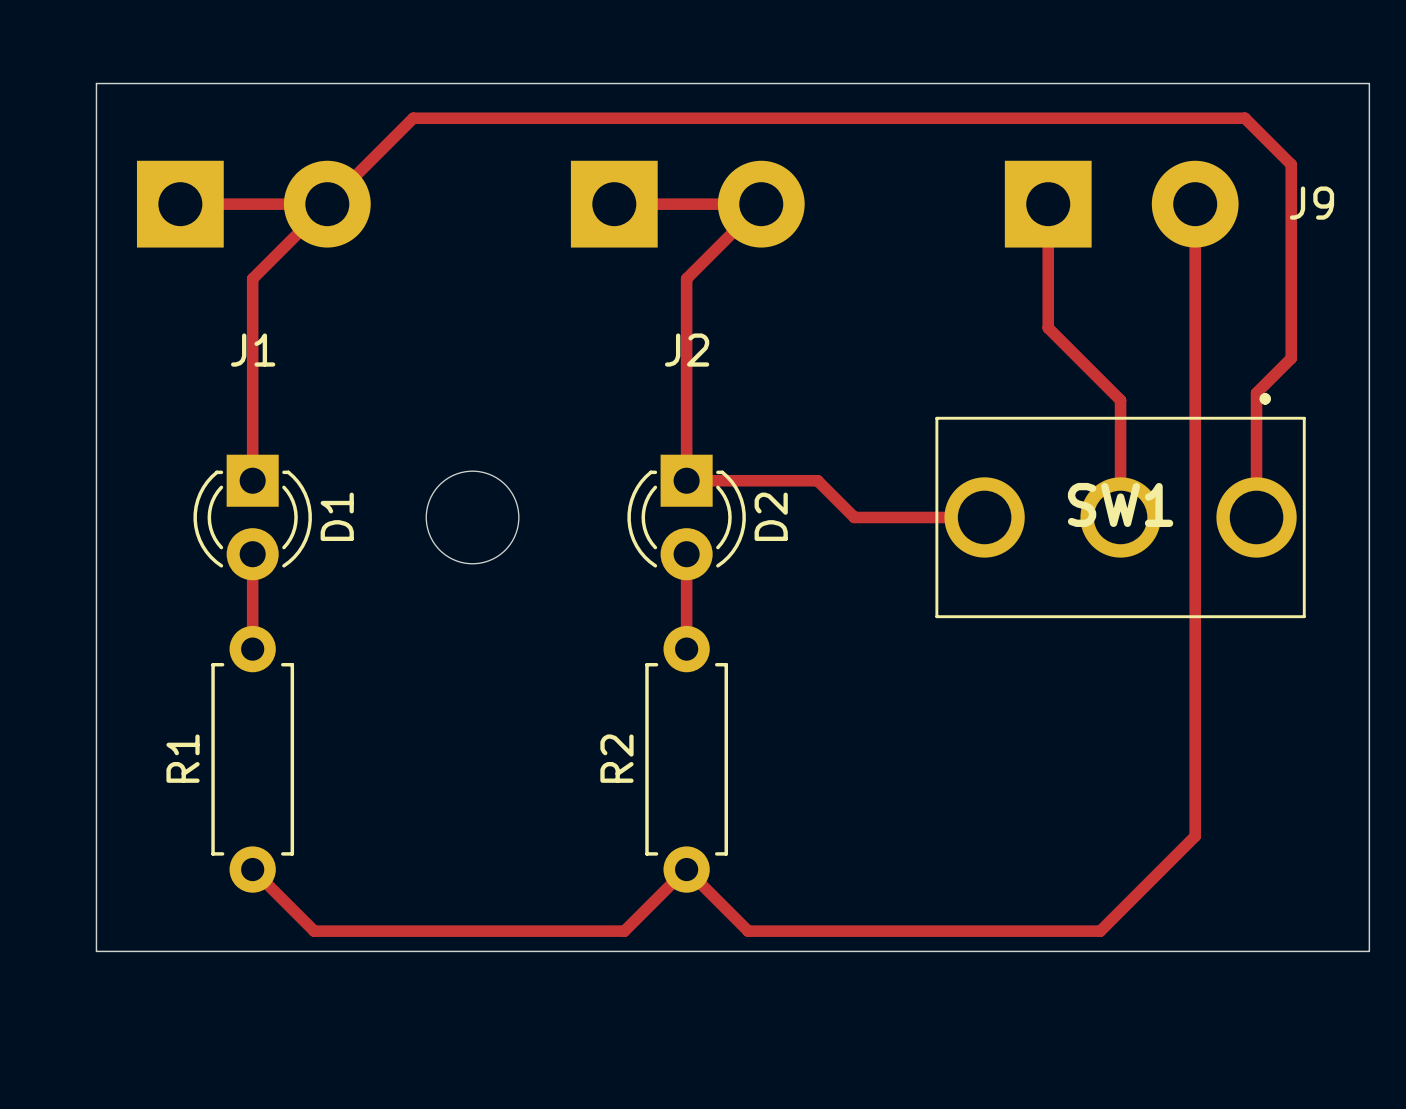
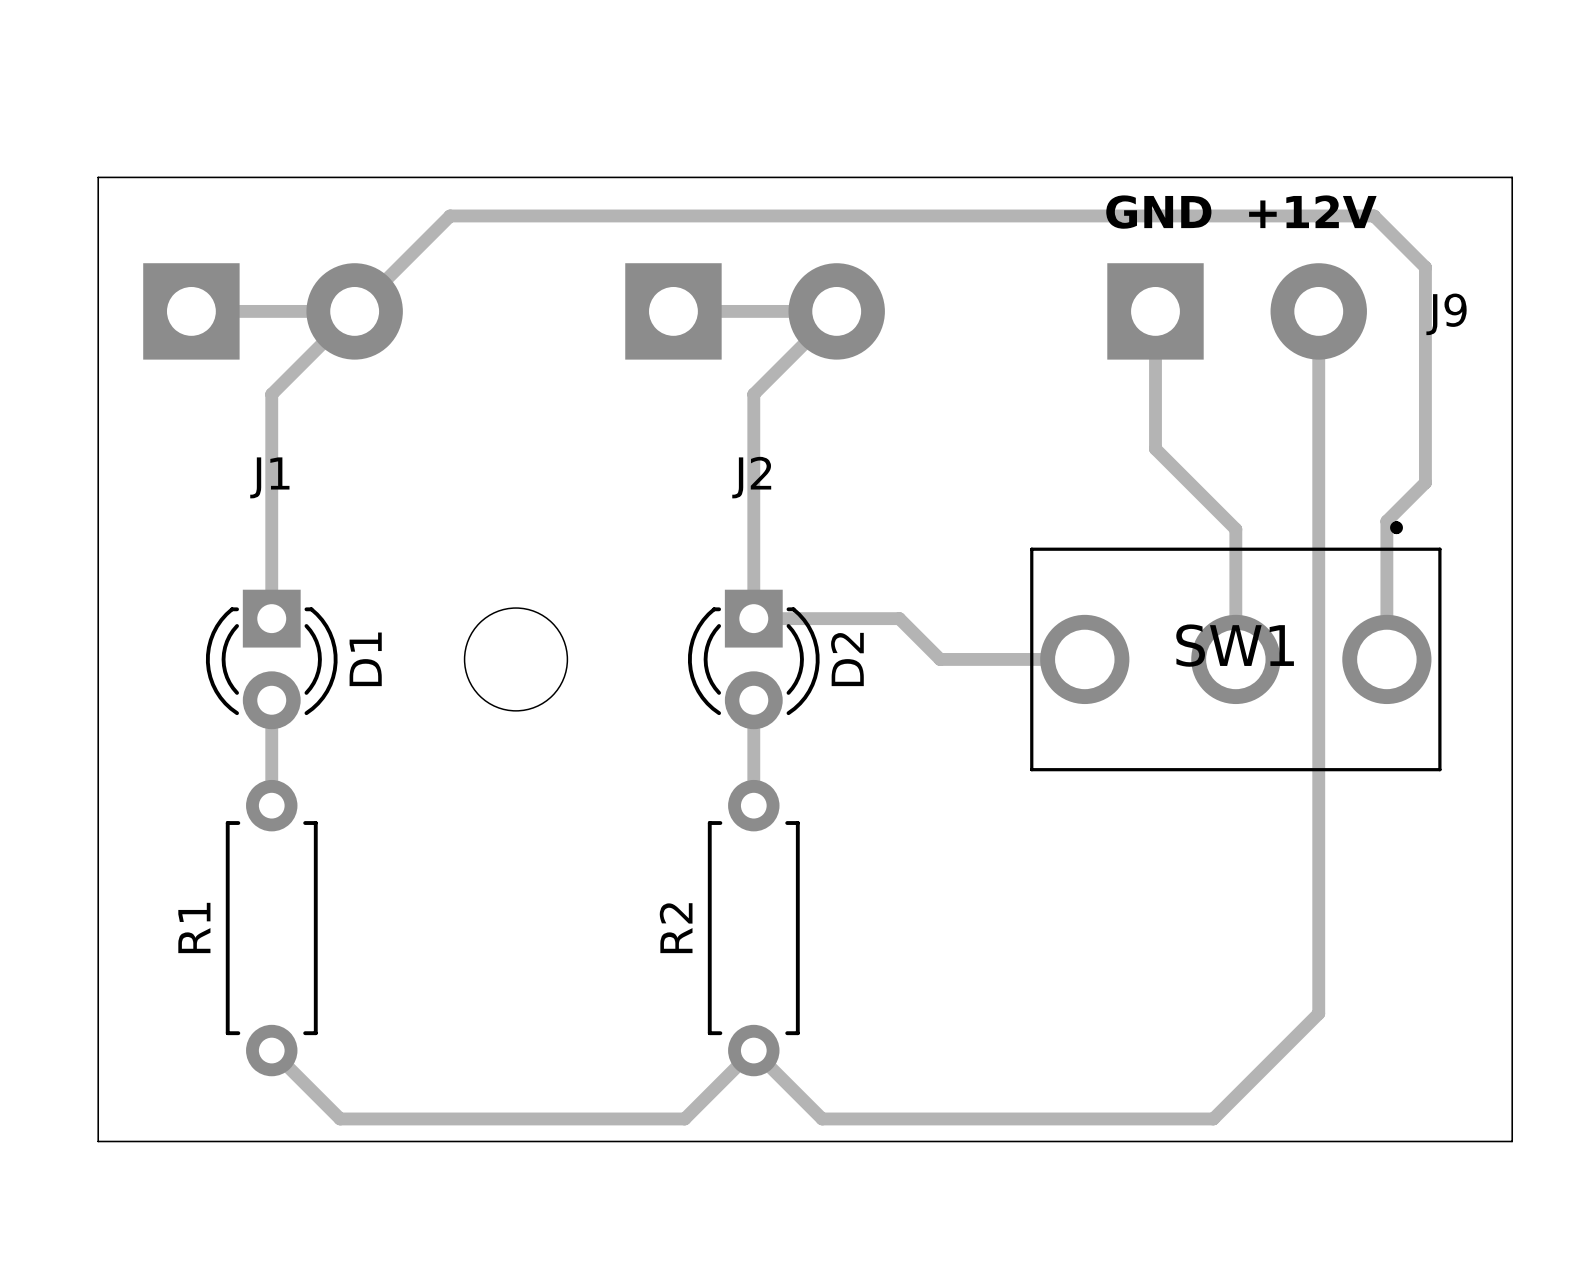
text: none -> GND +12V (1241, 212)

